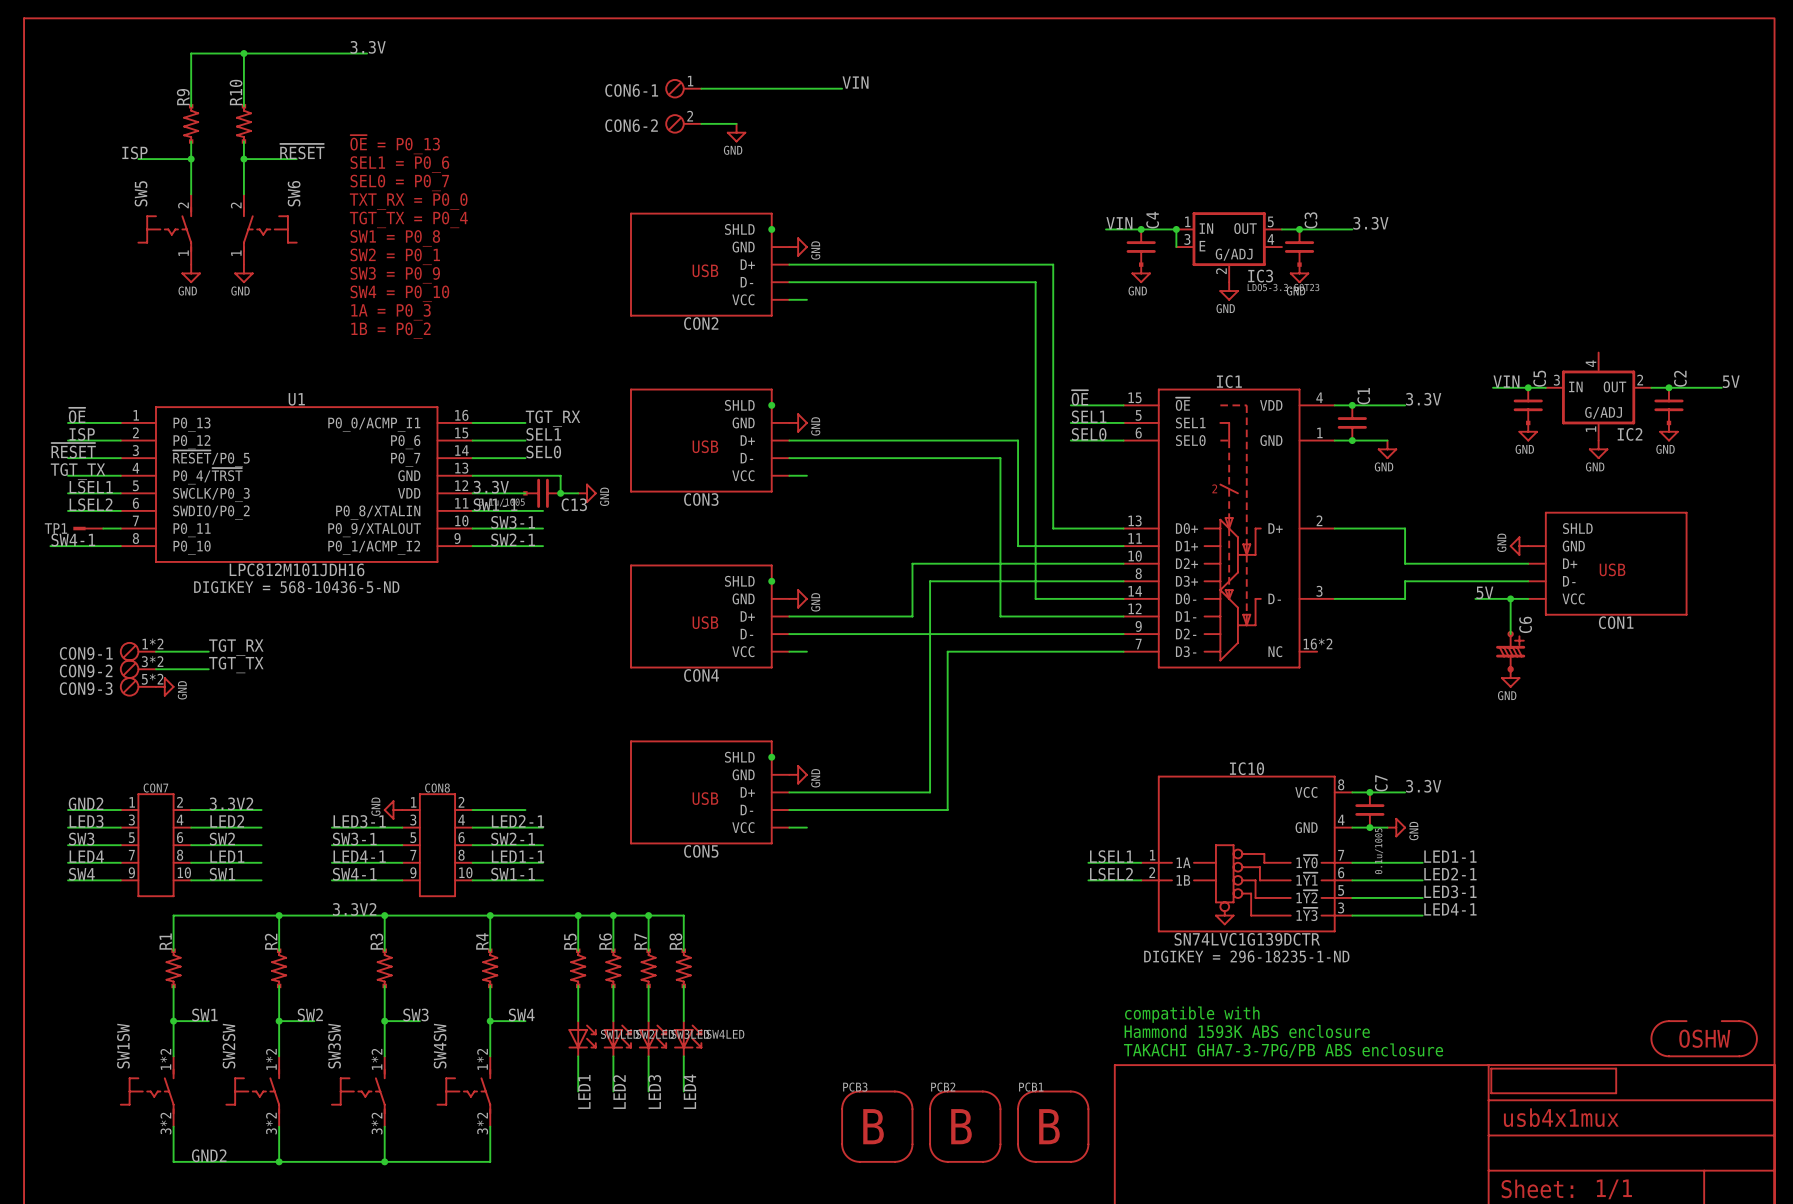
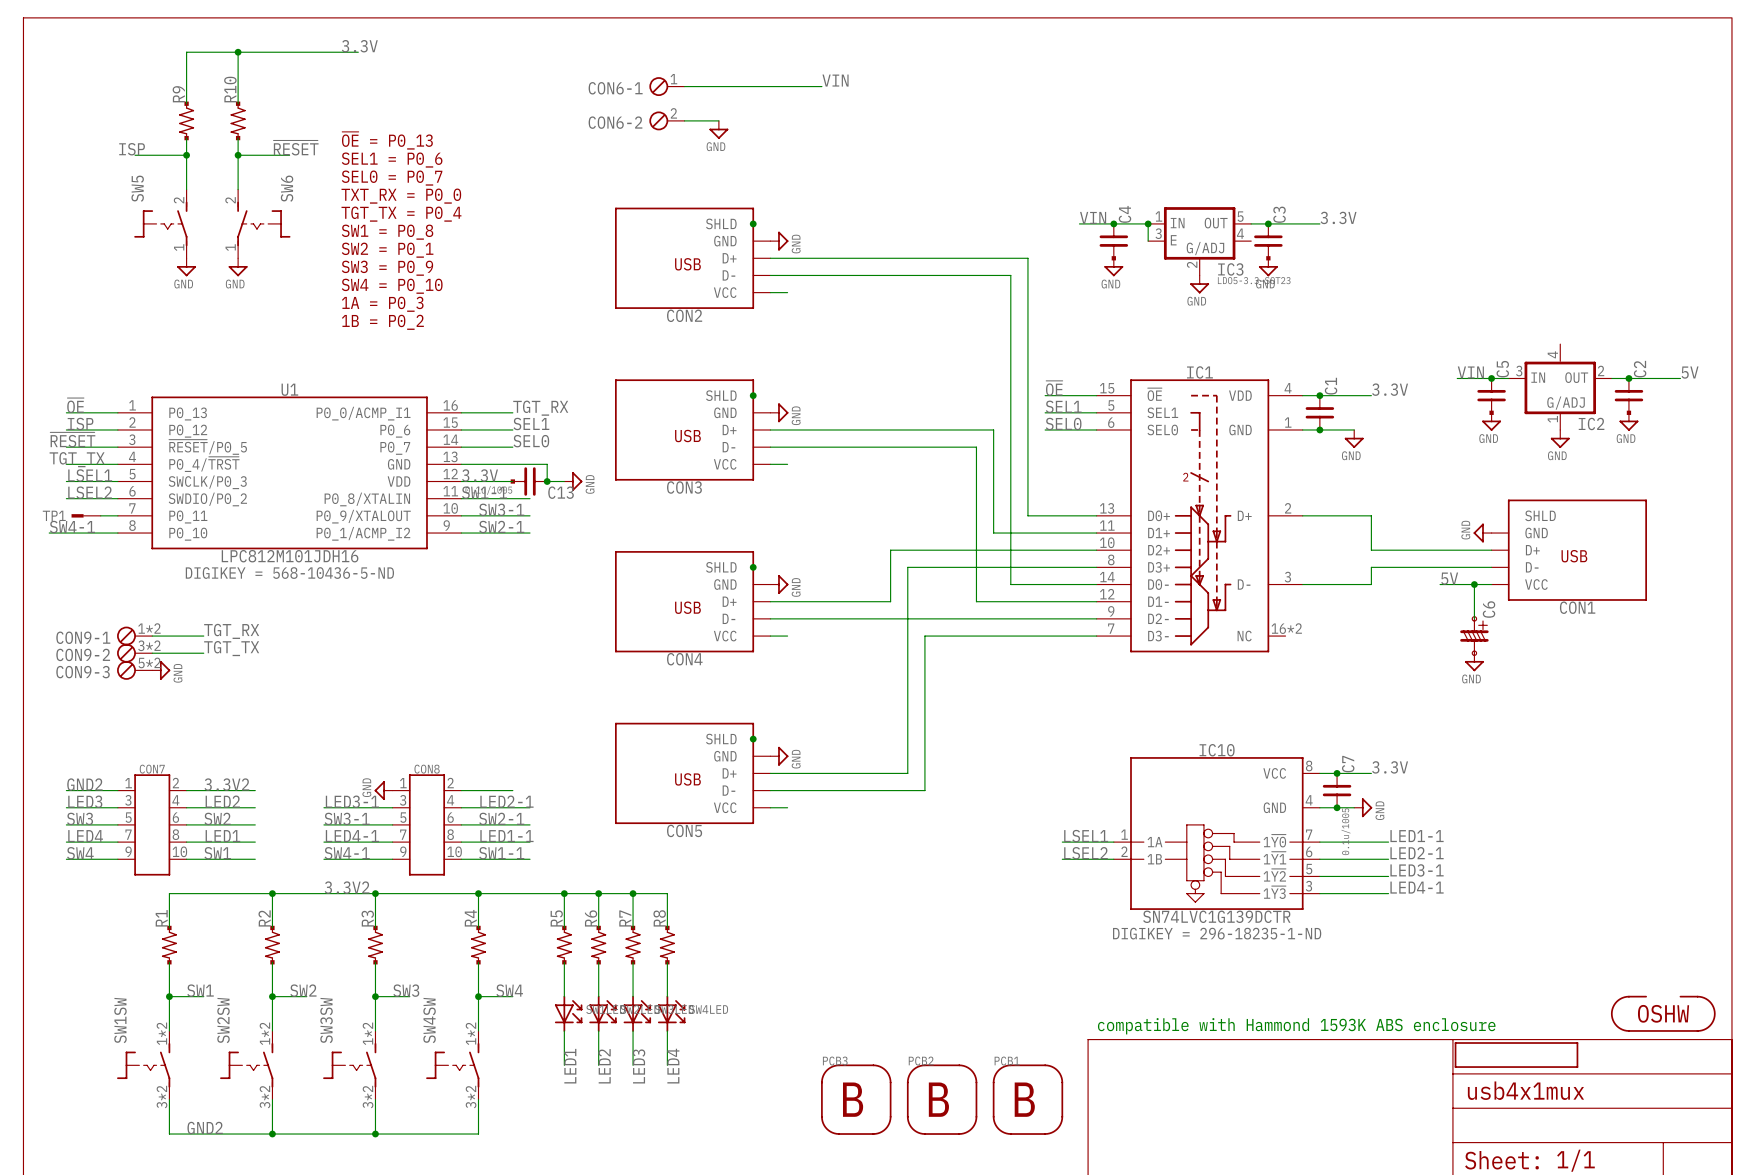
text: compatible with (1192, 1014) -> none
text: Hammond 1593K ABS enclosure (1247, 1031) -> none
text: TAKACHI GHA7-3-7PG/PB ABS enclosure (1283, 1050) -> compatible with Hammond 1593K ABS enclosure (1296, 1026)

